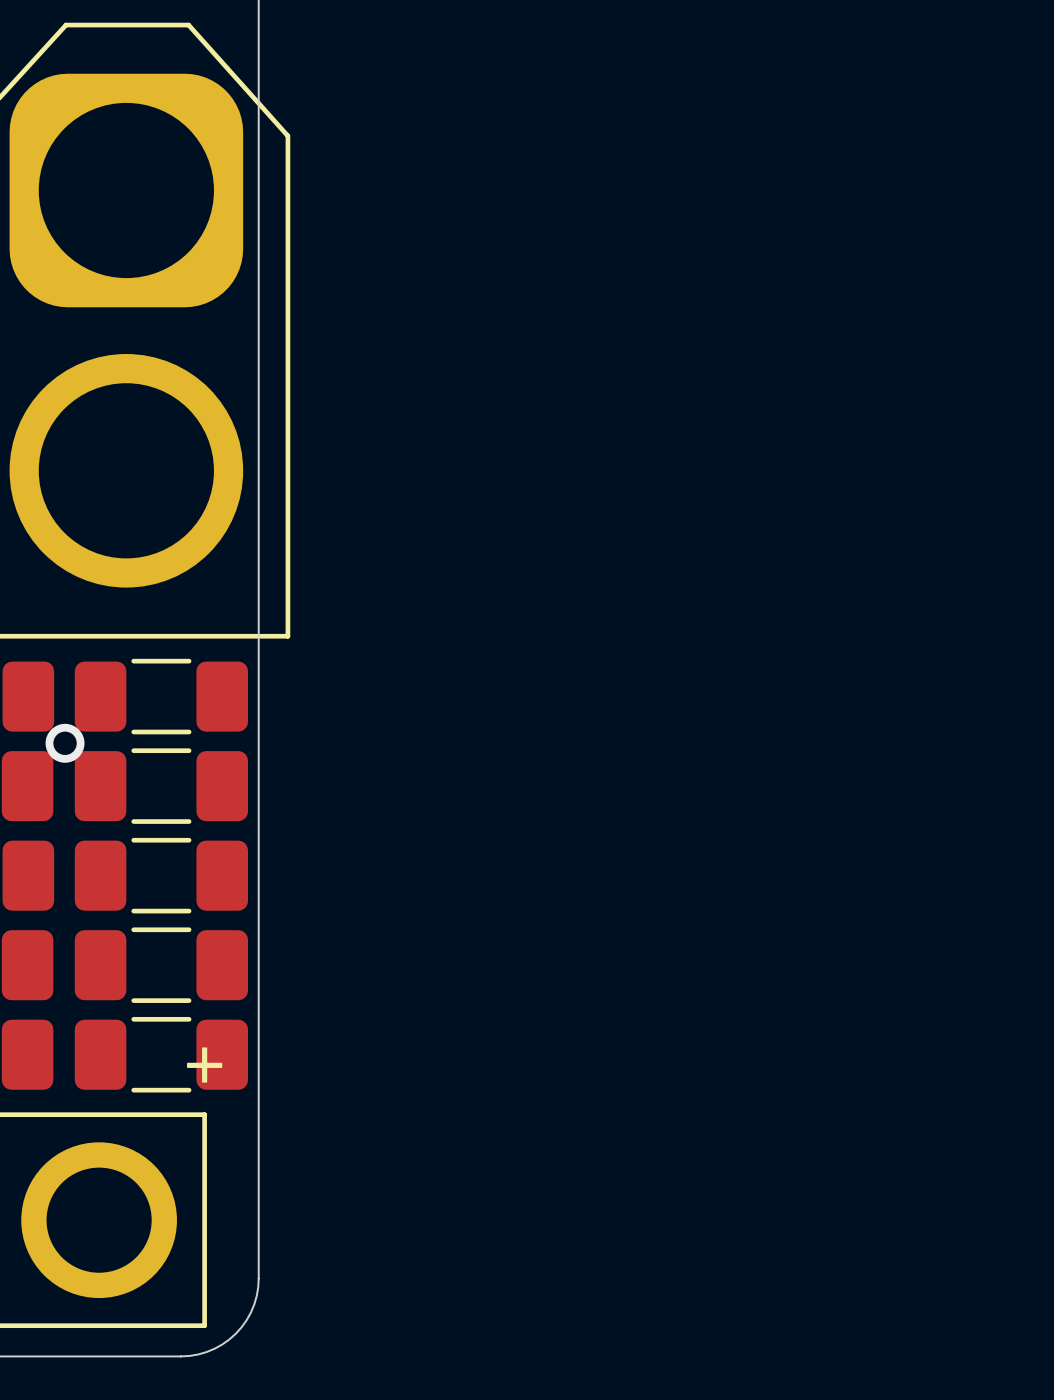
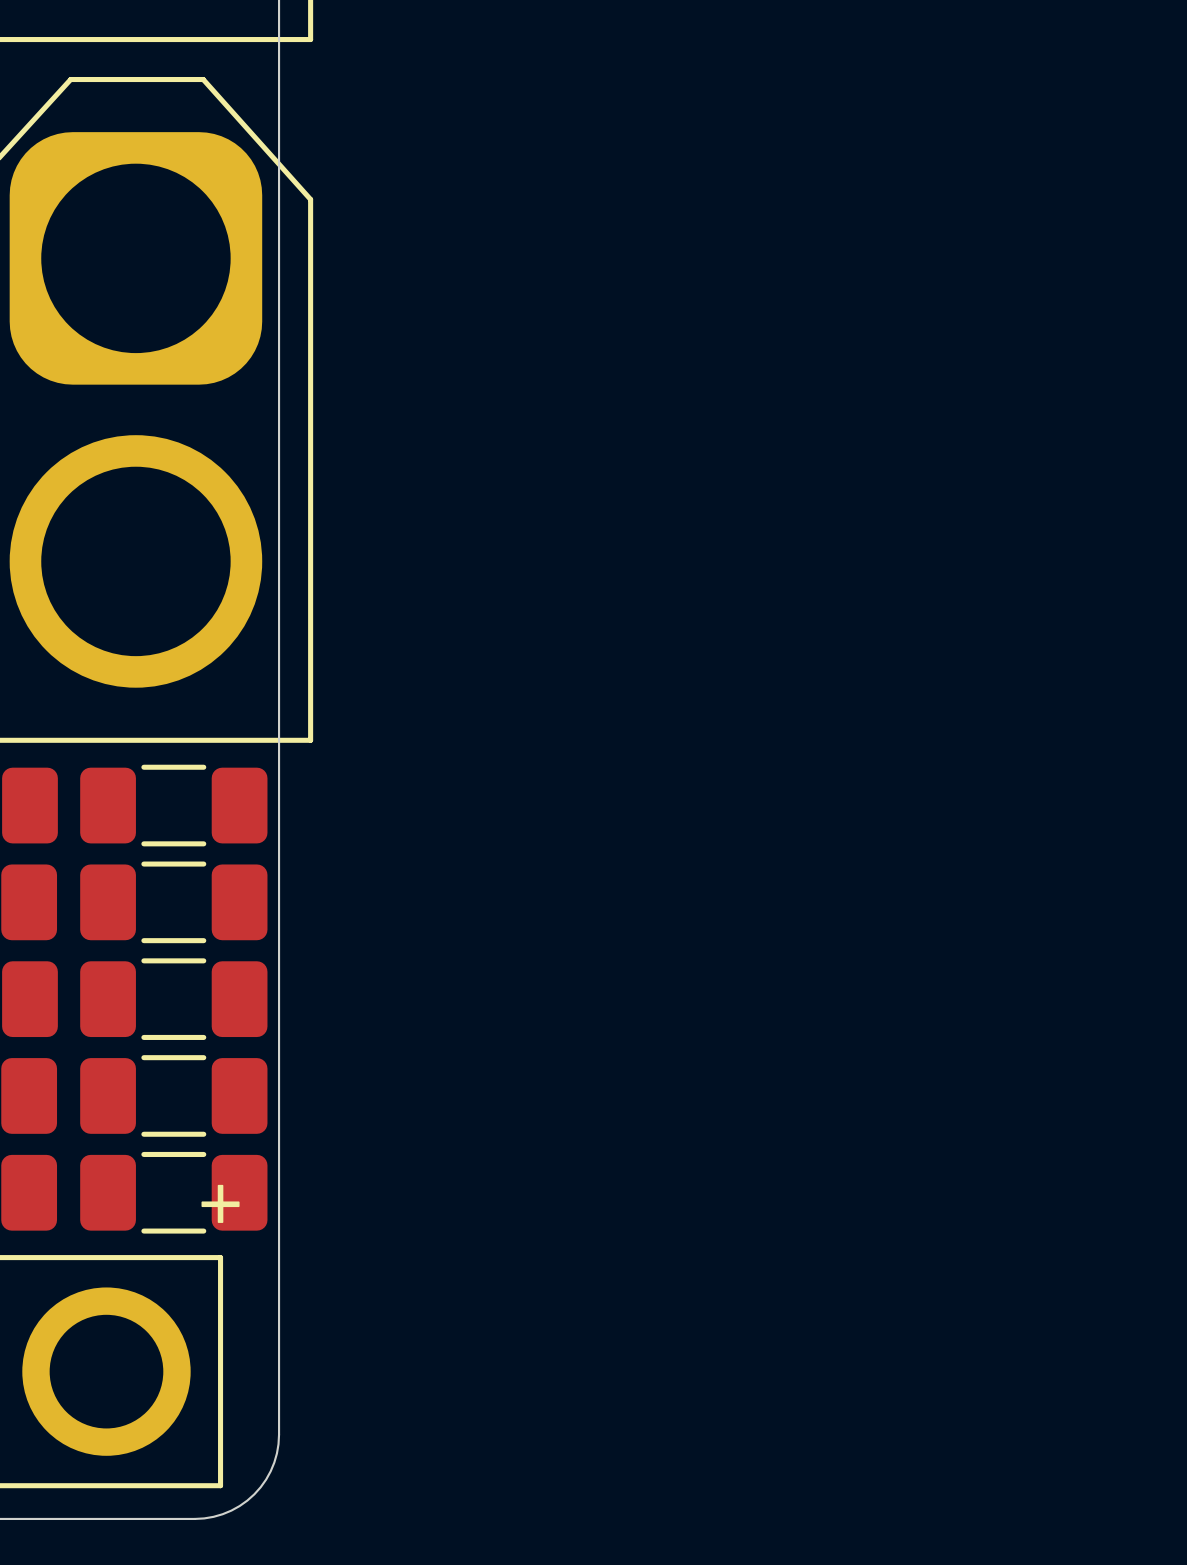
via: (65, 743) -> none

